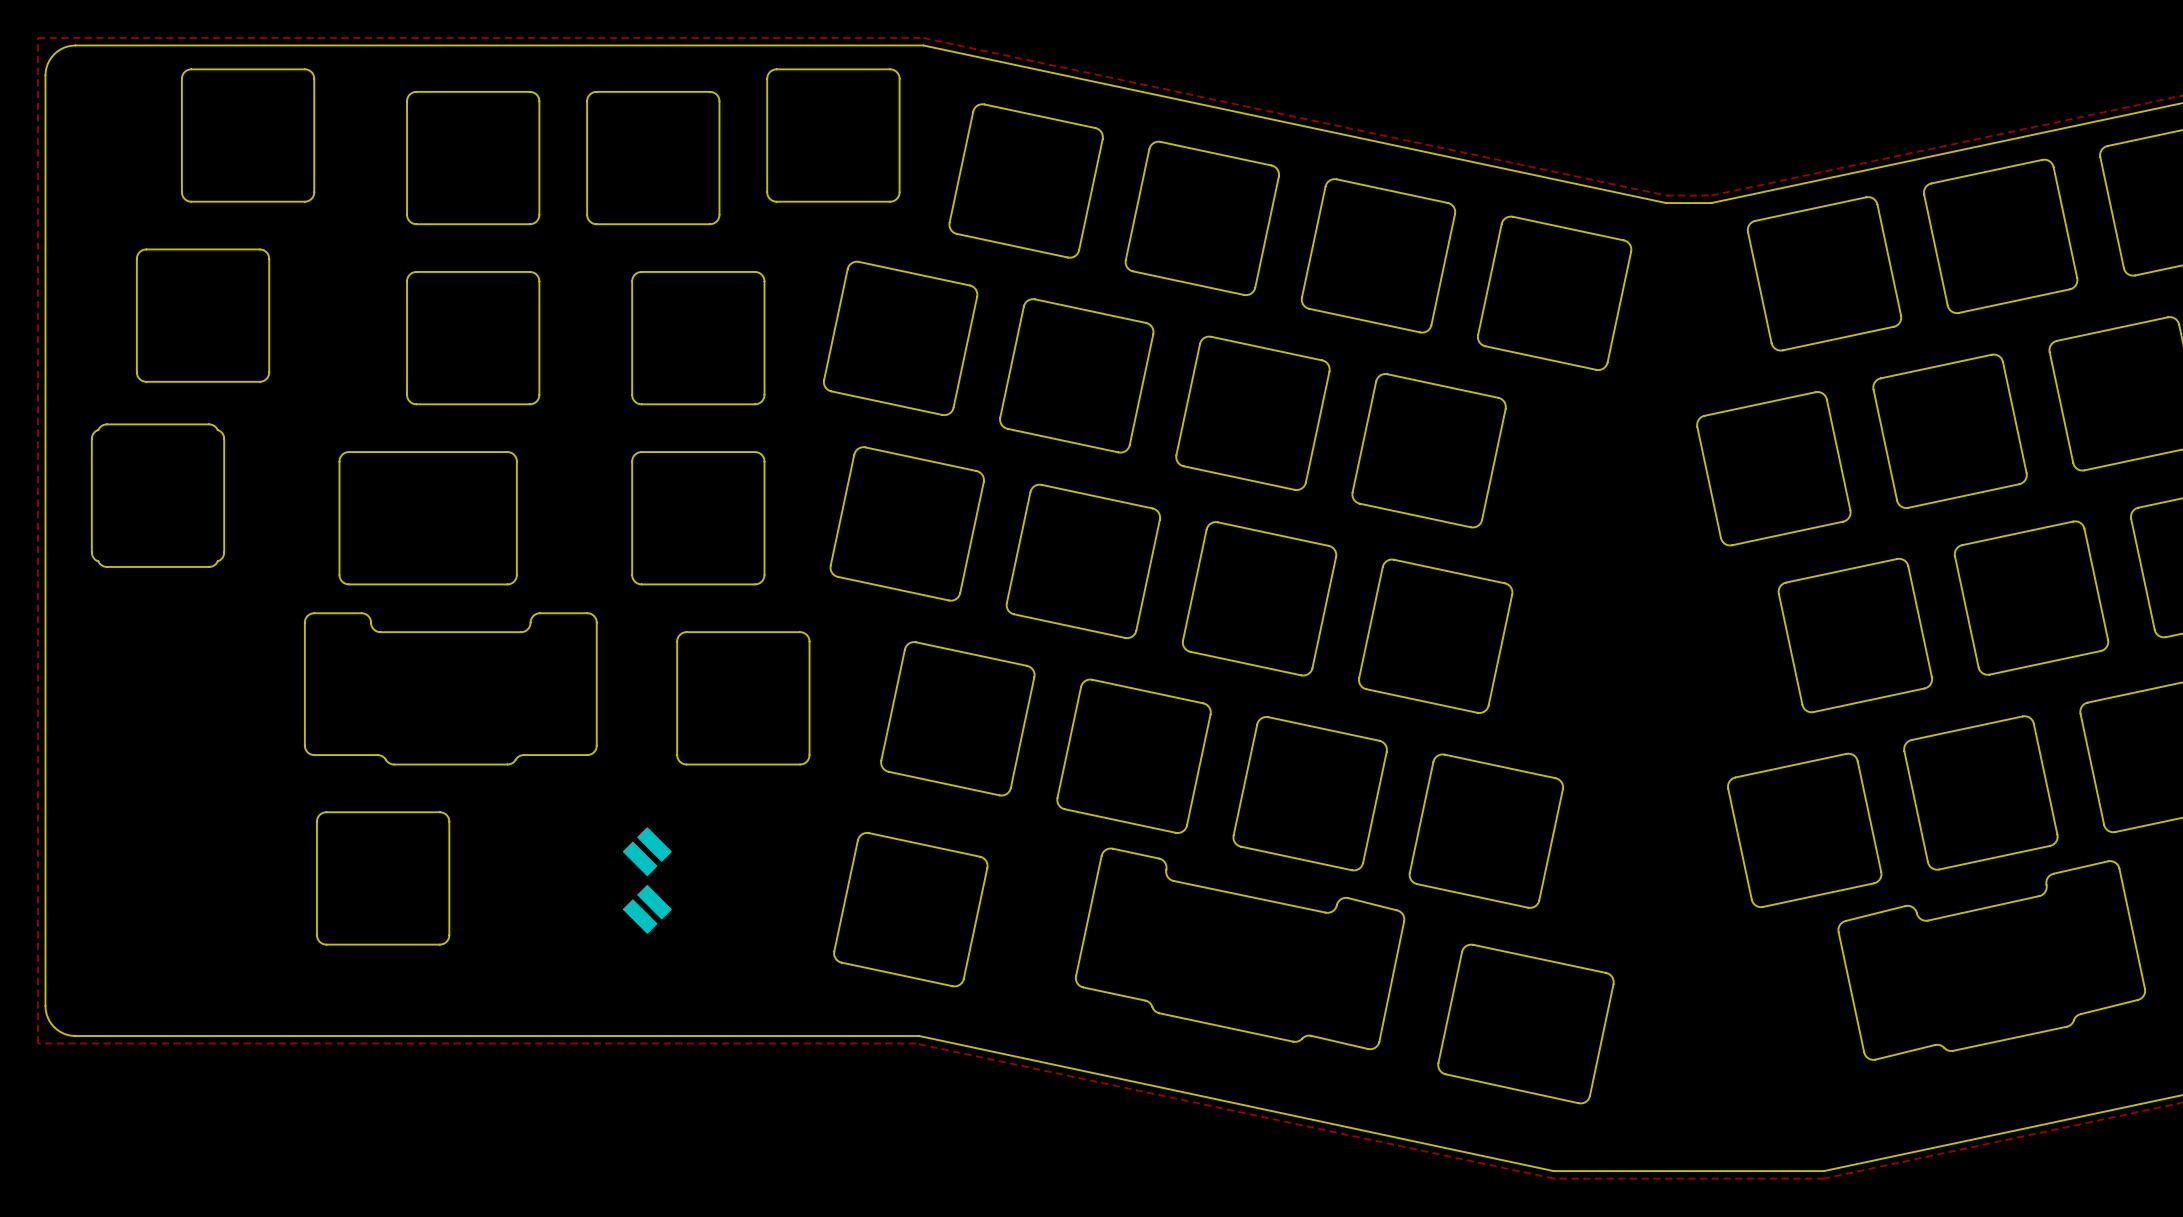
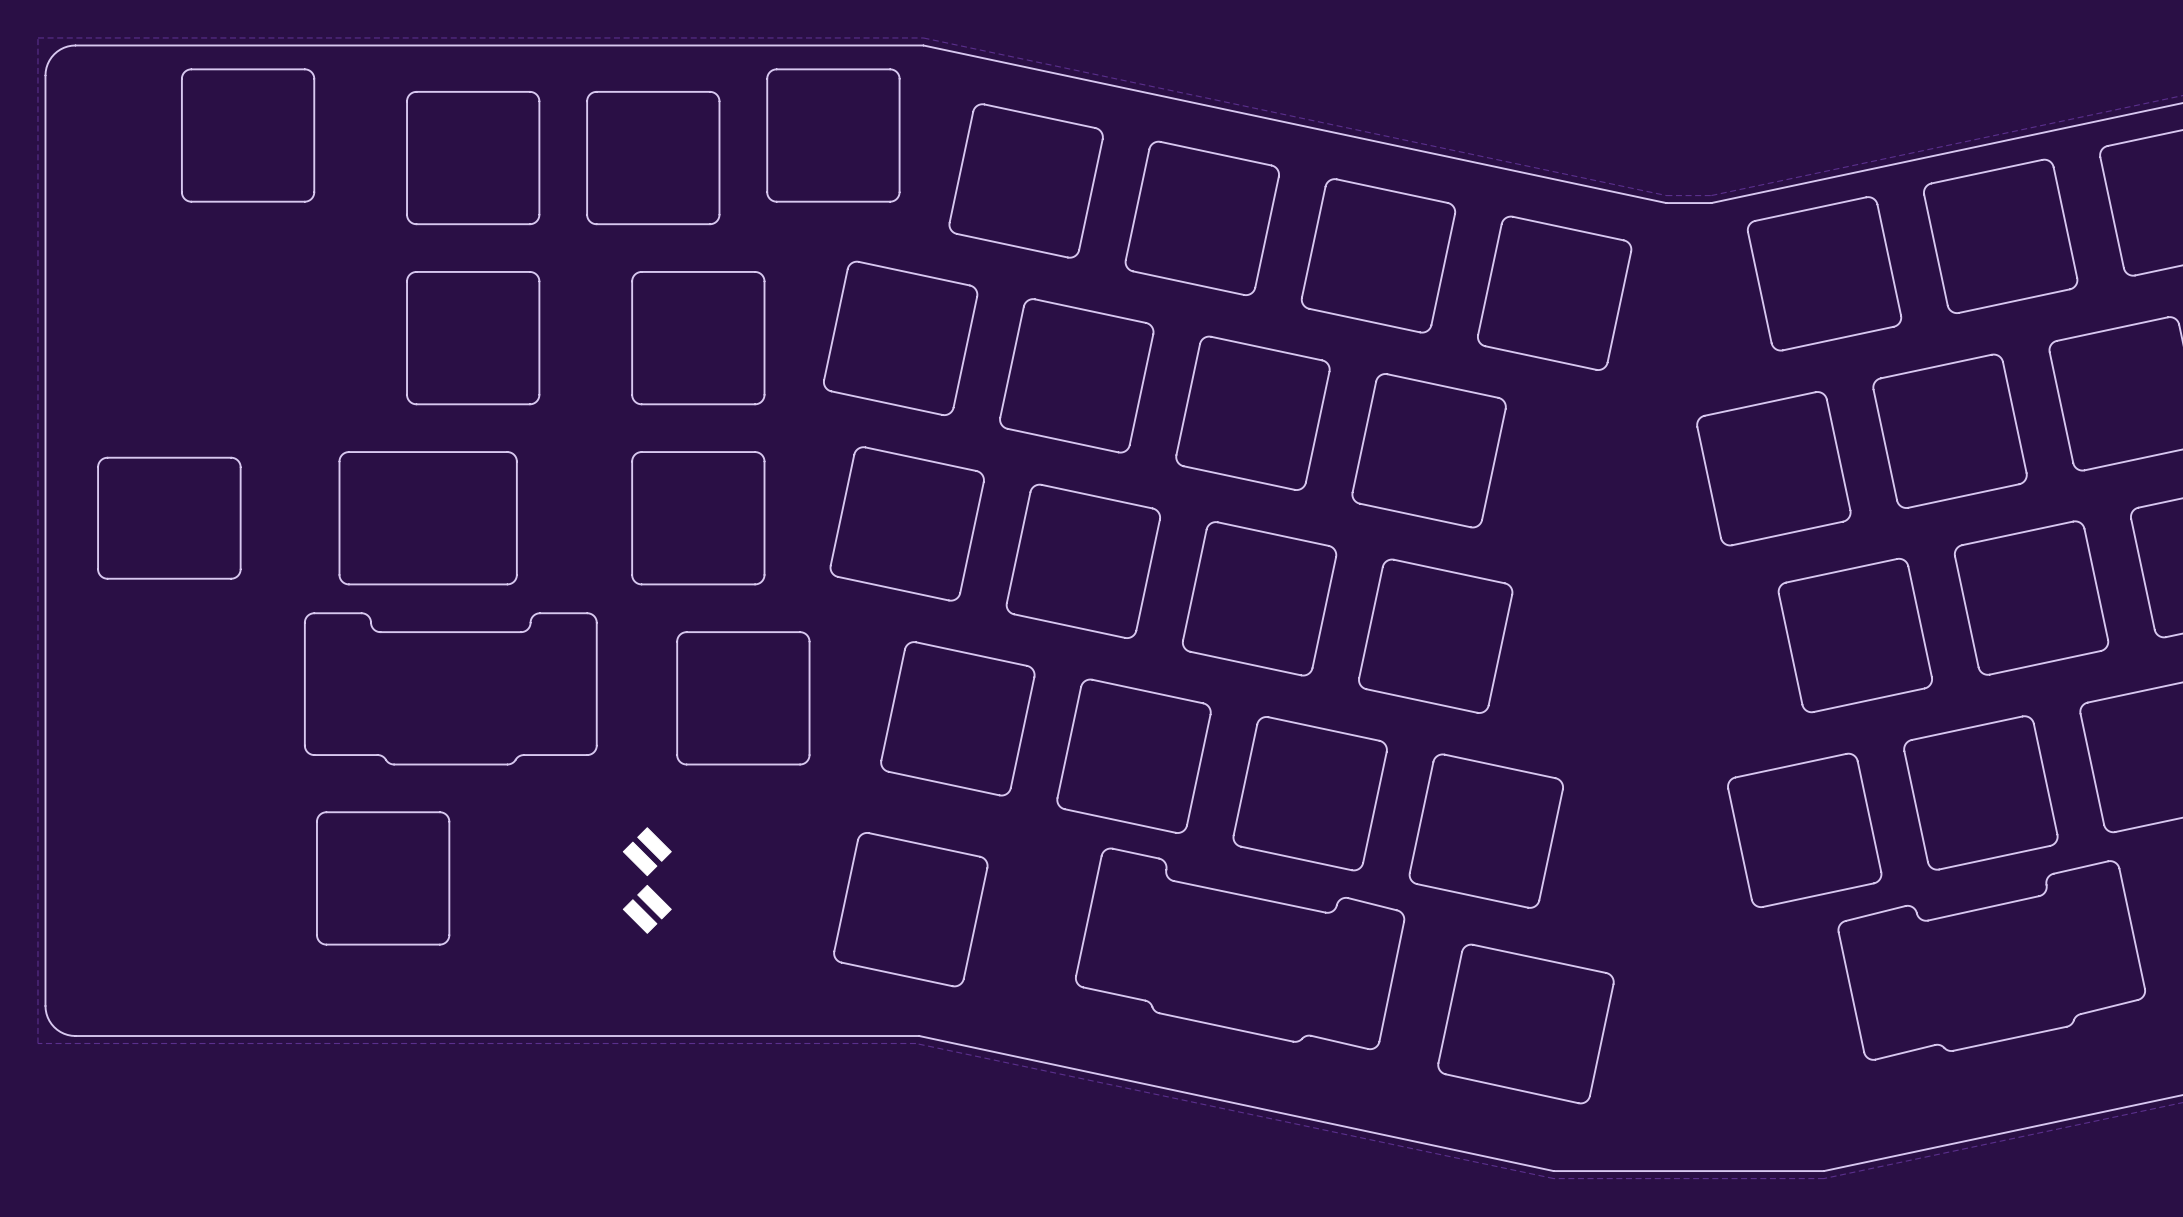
board edge: (146, 249) (259, 249) (266, 252) (269, 258) (269, 372) (266, 379) (259, 381) (146, 381) (139, 379) (136, 372) (136, 258) (139, 252) (146, 249) -> none
board edge: (217, 429) (222, 433) (224, 438) (224, 552) (222, 557) (217, 561) -> none
board edge: (217, 429) (214, 425) (209, 424) (105, 424) (94, 432) (91, 438) (91, 552) (94, 558) (106, 566) (209, 566) (214, 565) (217, 561) -> none
board edge: none -> (107, 457) (231, 457) (237, 460) (240, 467) (240, 569) (237, 575) (231, 578) (107, 578) (100, 575) (98, 569) (98, 467) (100, 460) (107, 457)

